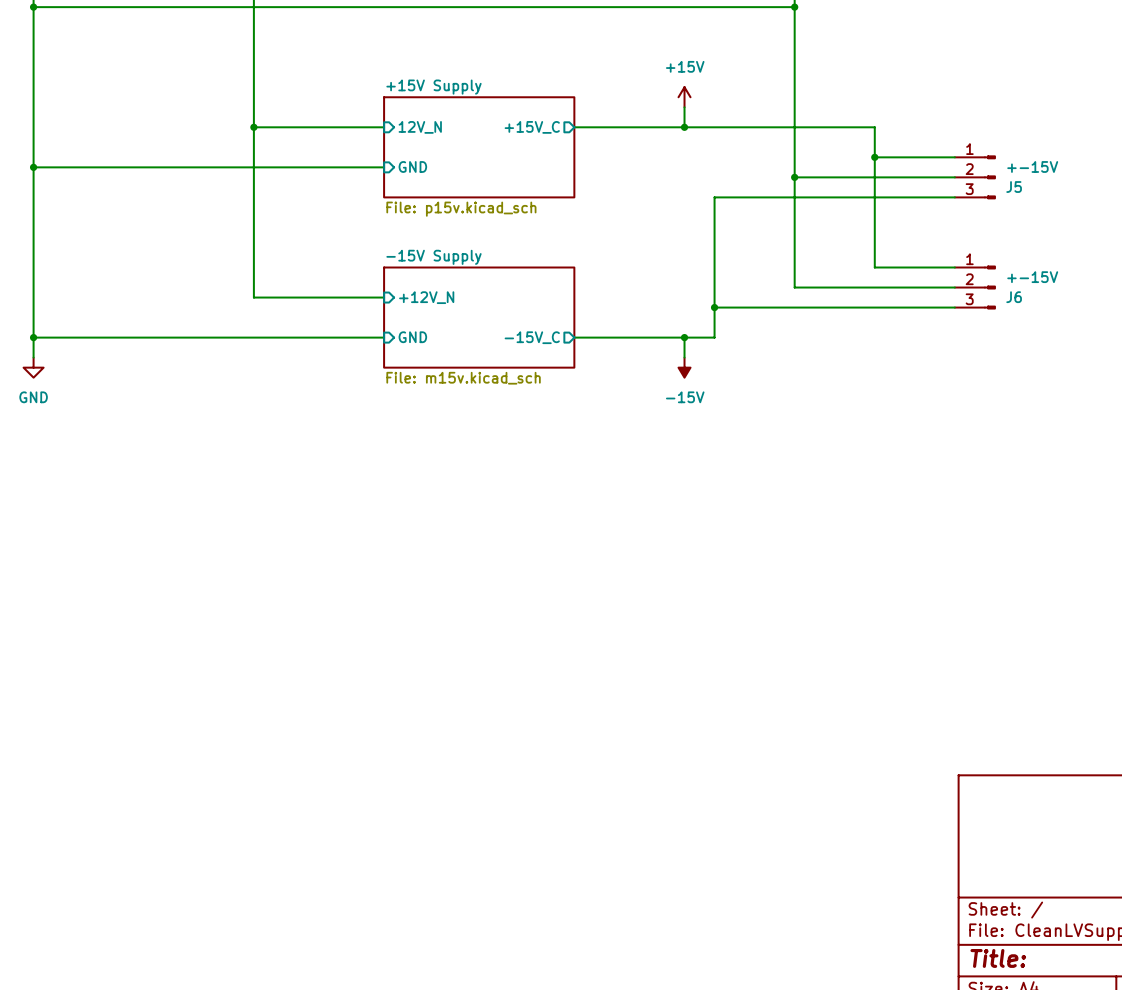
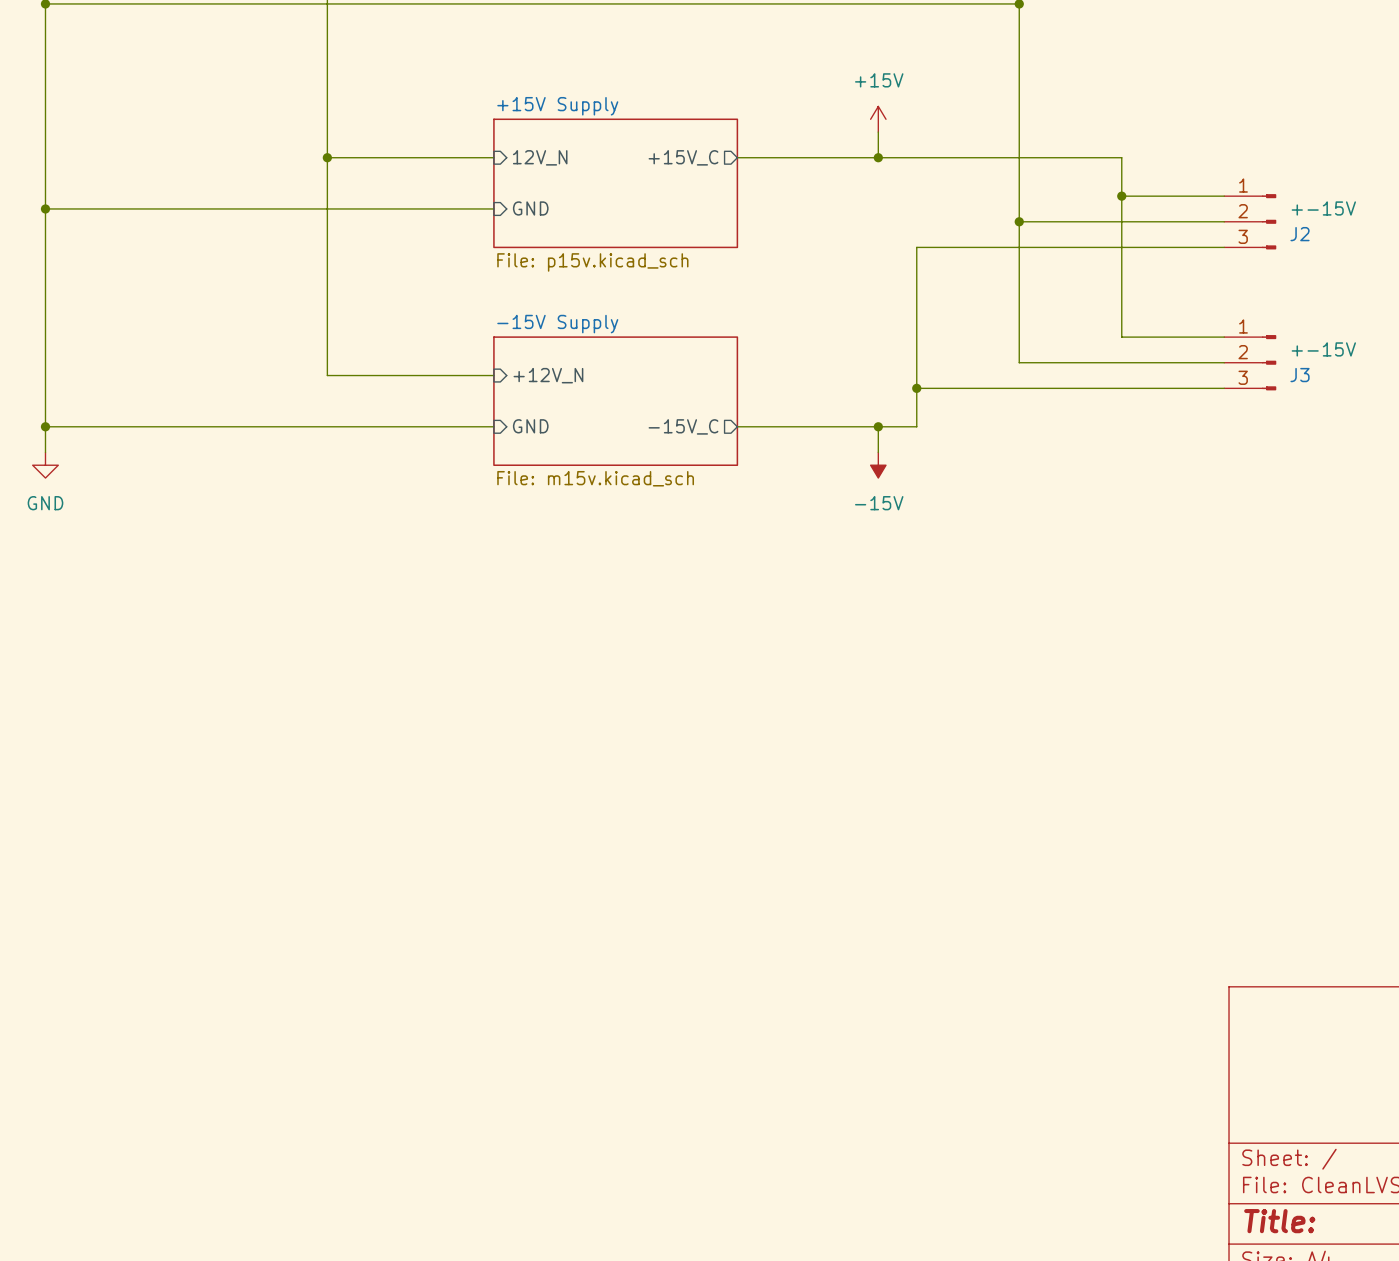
J5 name: J5 (1014, 187) -> J2 (1300, 234)
J6 name: J6 (1014, 297) -> J3 (1300, 375)

